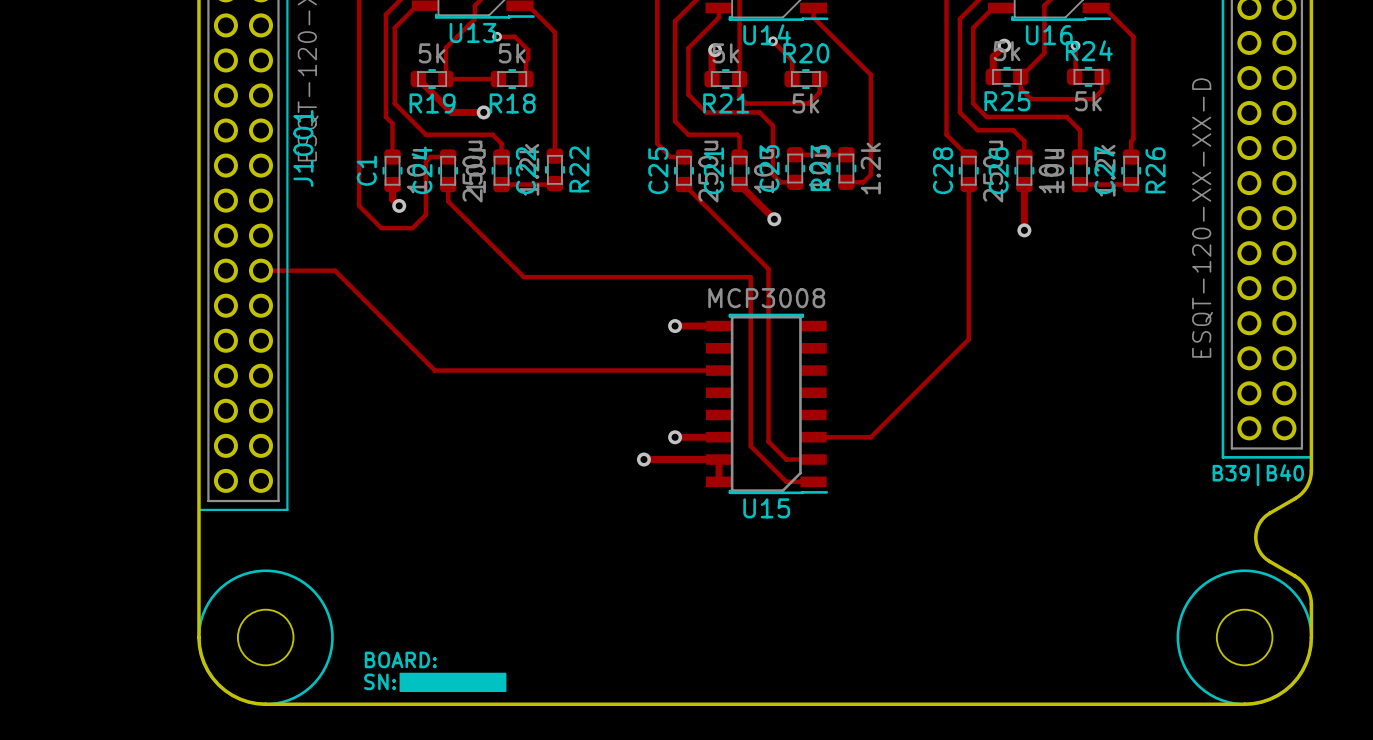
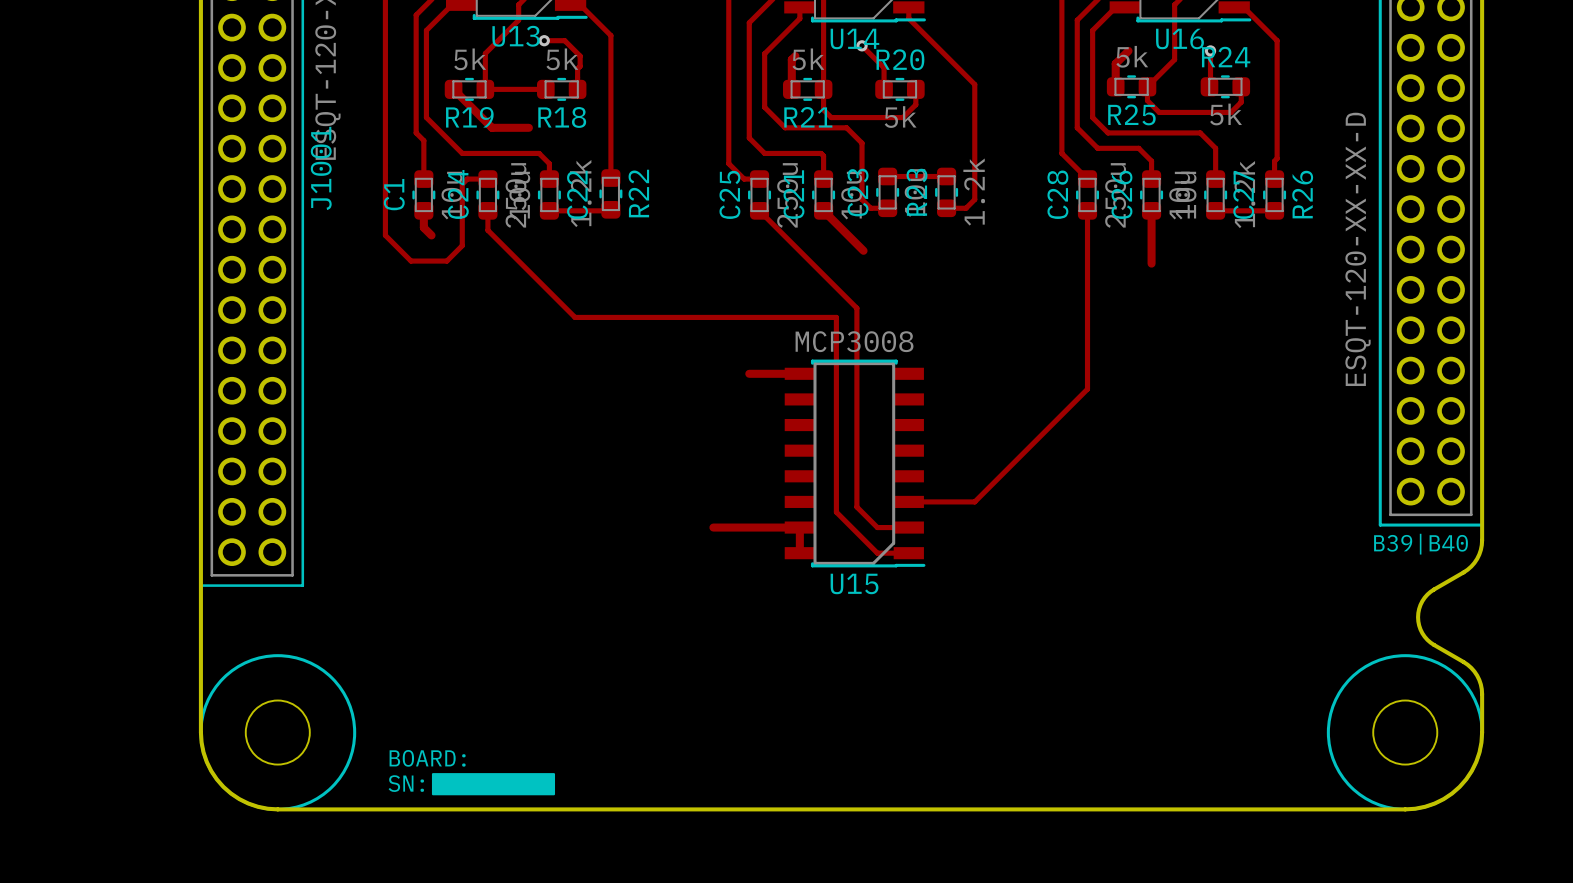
via: (1004, 45) -> none
via: (715, 50) -> none
via: (483, 112) -> none
via: (399, 205) -> none
via: (774, 219) -> none
via: (1024, 230) -> none
track: (260, 270) (334, 270) (434, 370) (719, 370) -> none
via: (675, 326) -> none
track: (675, 437) (719, 437) -> none
via: (675, 437) -> none
via: (643, 459) -> none

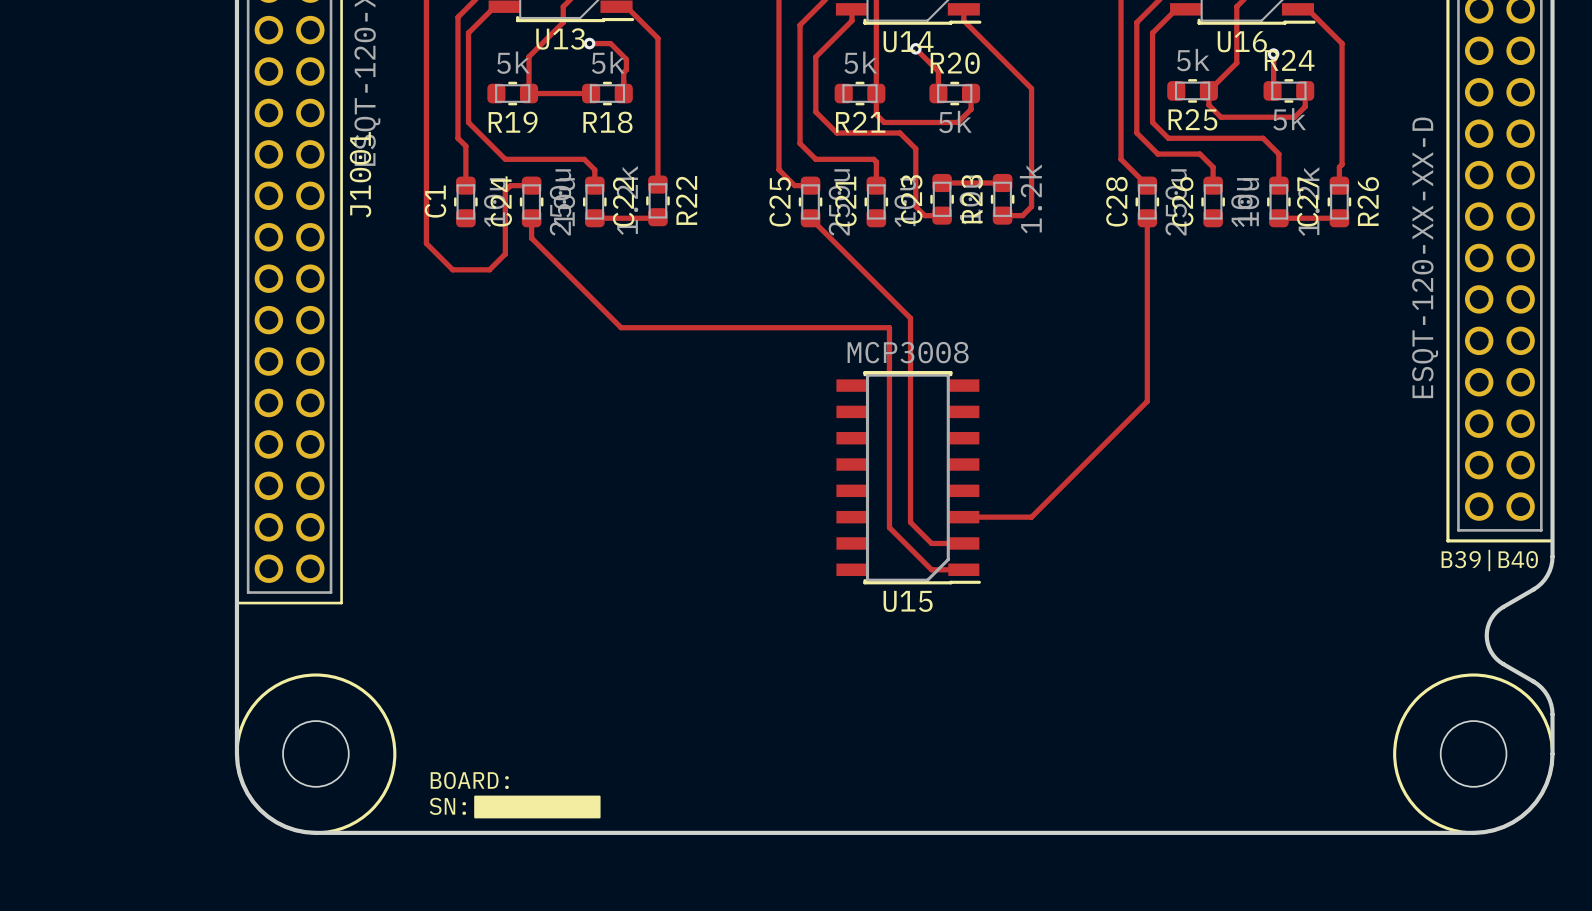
track: (1128, 50) (1115, 63) (1115, 86) -> none
track: (795, 56) (791, 59) (791, 89) -> none
track: (453, 89) (492, 127) (528, 127) -> none
track: (423, 210) (423, 227) (431, 235) -> none
track: (823, 210) (863, 250) -> none
track: (1151, 210) (1151, 263) -> none
track: (749, 373) (799, 373) -> none
track: (713, 527) (799, 527) (799, 553) -> none

